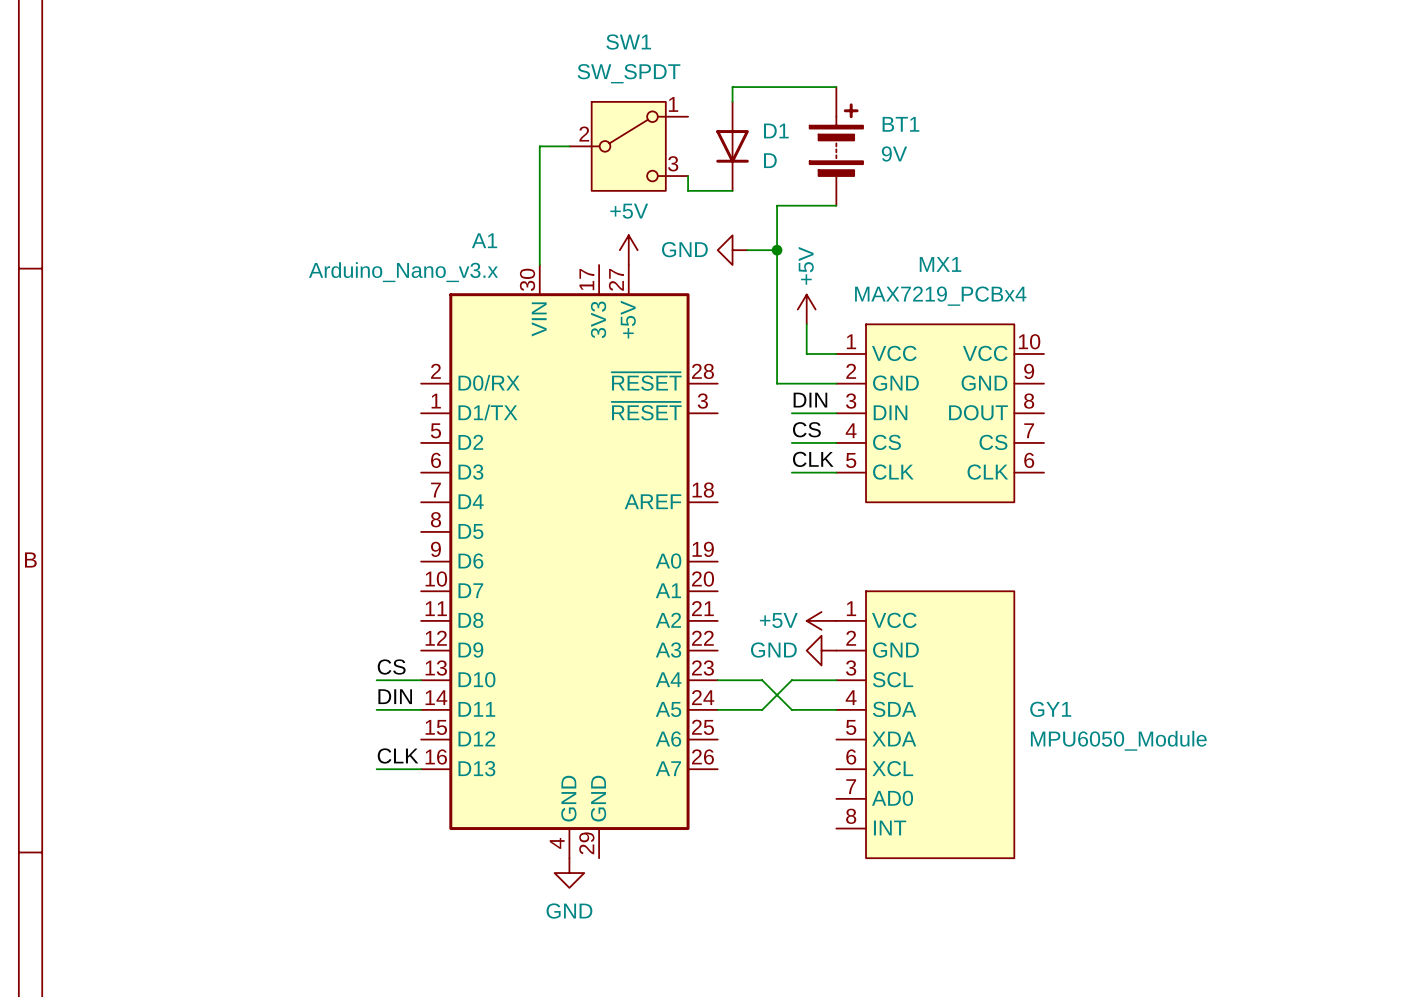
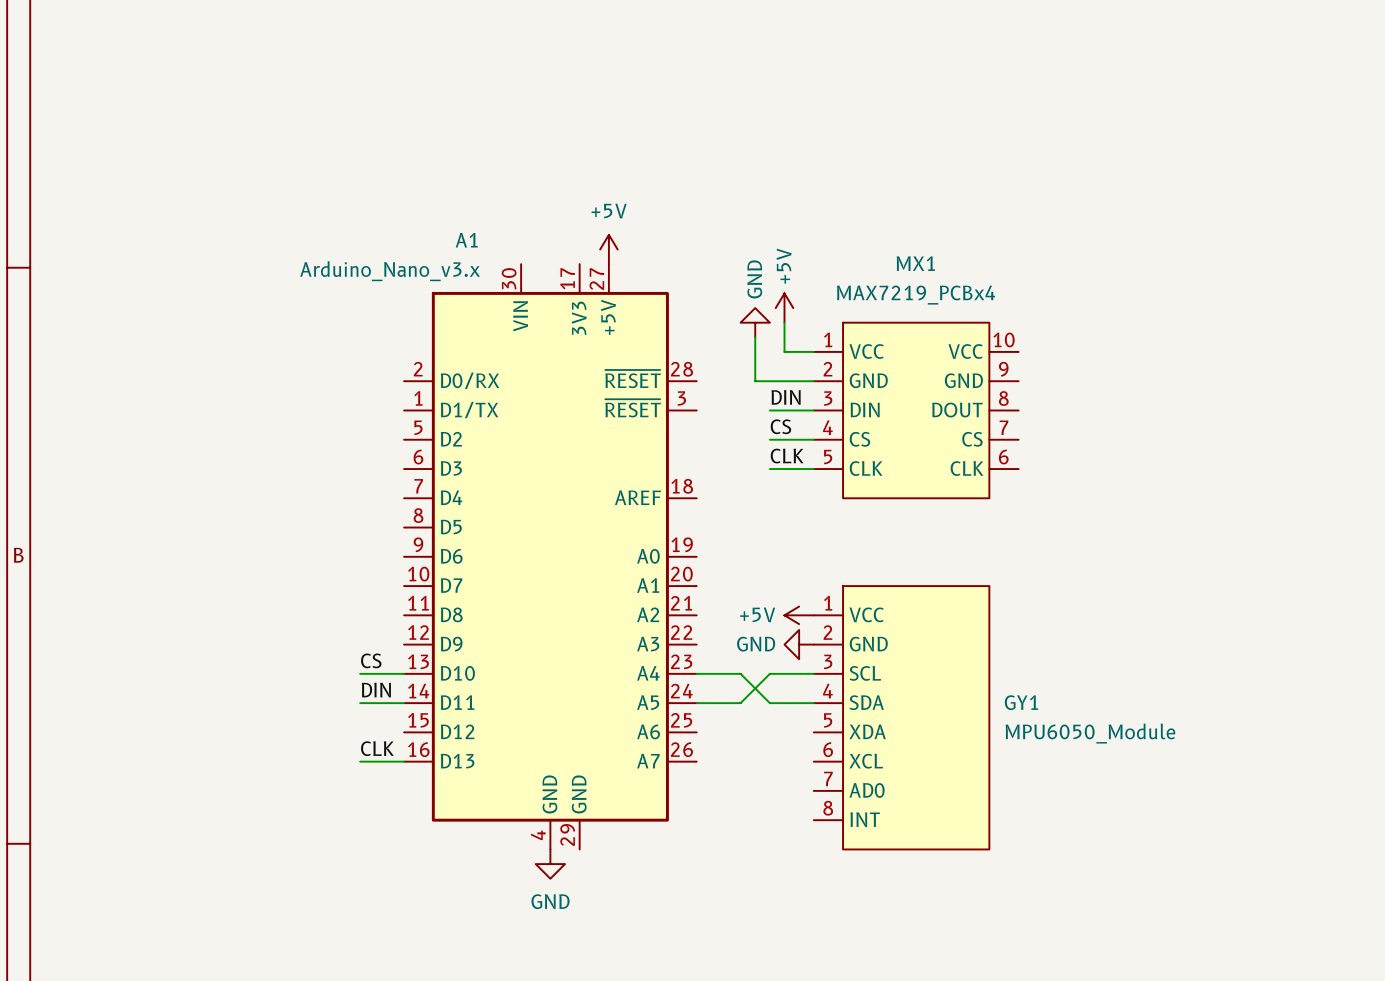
wire: (836, 87) (732, 87) (732, 101) -> none
wire: (569, 146) (539, 146) (539, 265) -> none
SW1: SW_SPDT (628, 146) -> none
D1: D (732, 146) -> none
BT1: 9V (836, 146) -> none
wire: (688, 176) (688, 190) (732, 190) -> none
wire: (836, 205) (777, 205) (777, 339) -> none
power symbol rotation: 0° (732, 250) -> 90° clockwise (755, 322)
power symbol position: GND (732, 250) -> GND (755, 322)
wire: (747, 250) (777, 250) -> none
junction: (777, 250) -> none

